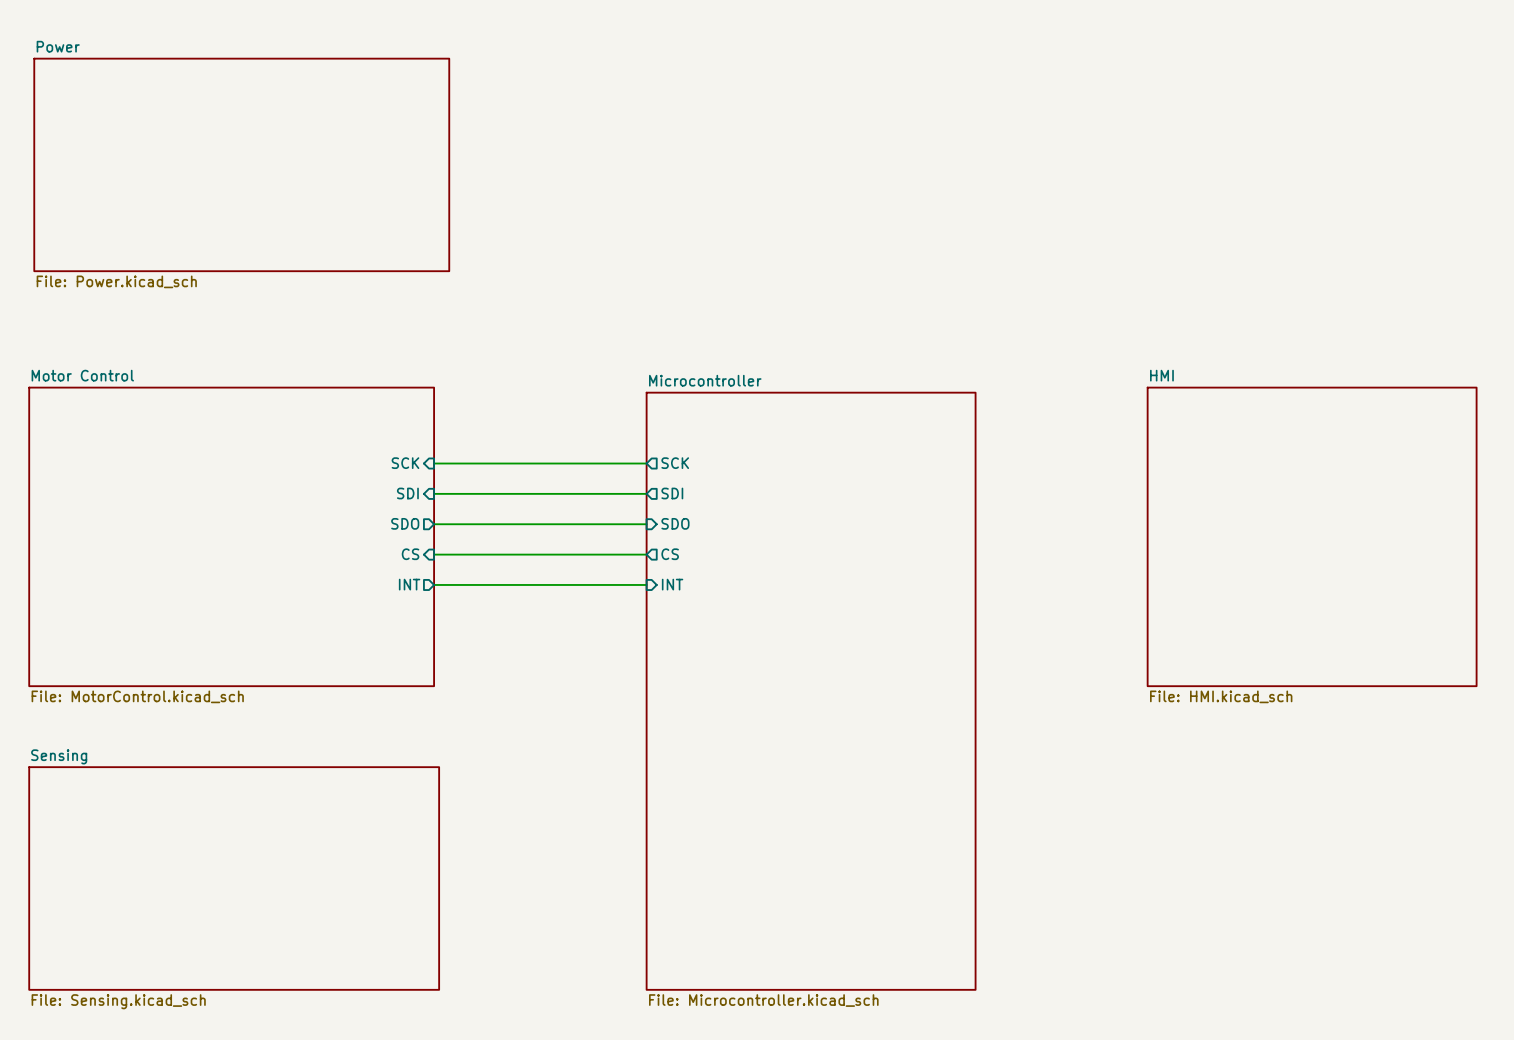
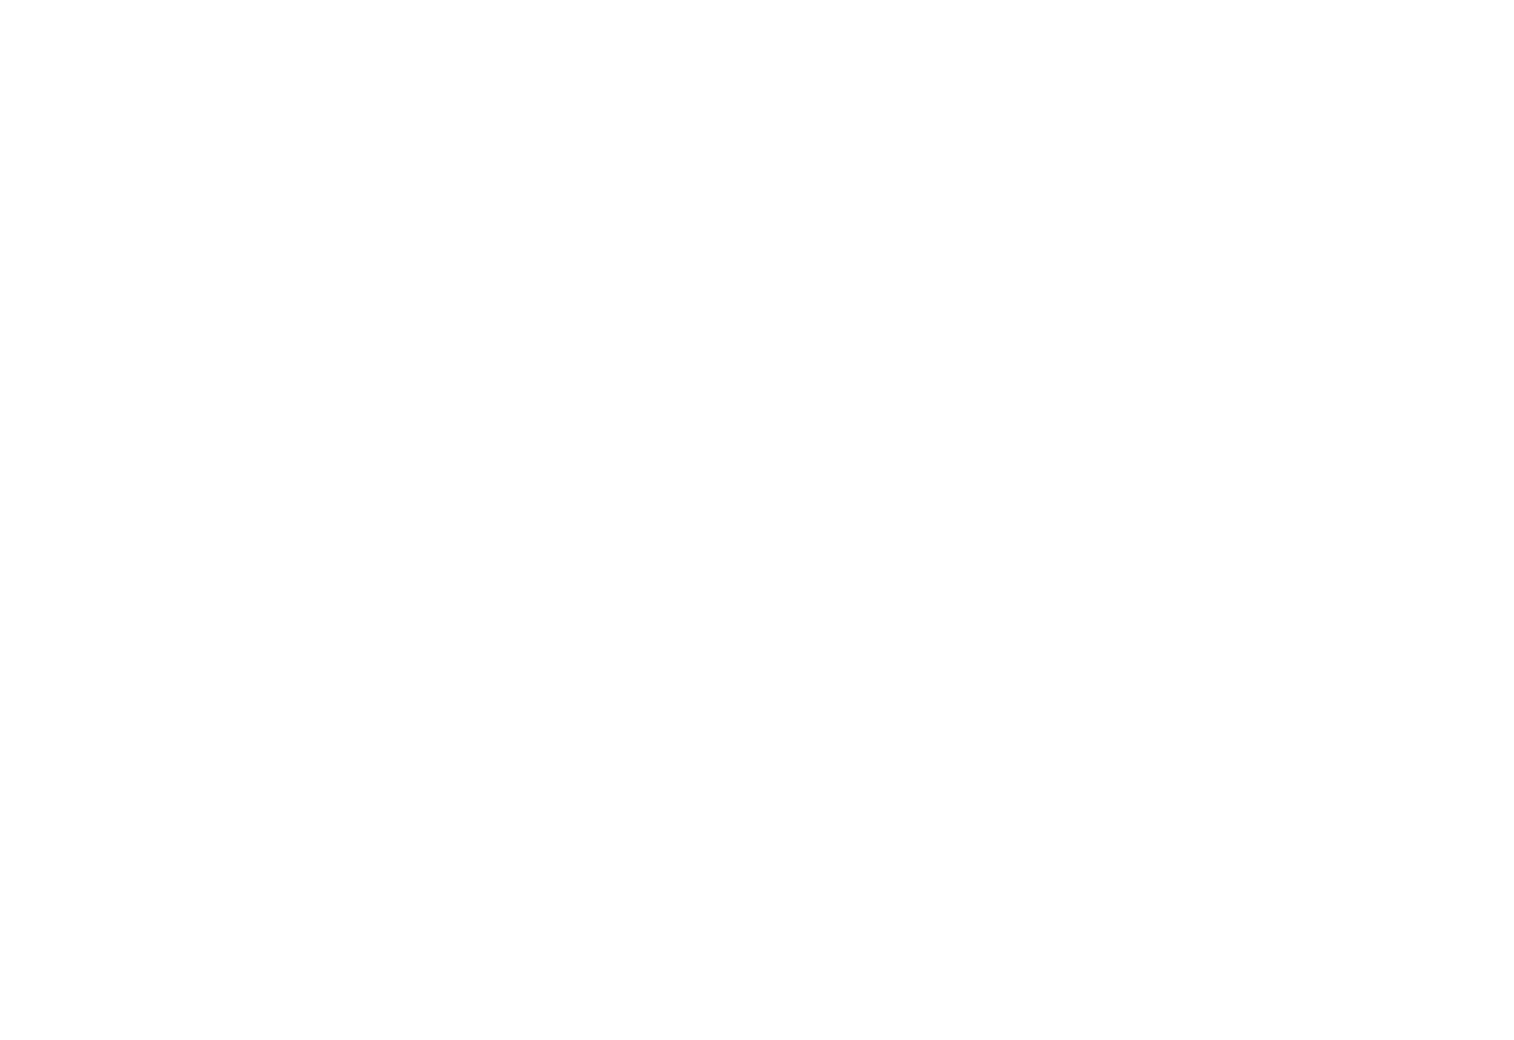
sheet Power: File: Power.kicad_sch (241, 164) -> none
sheet pin: SCK (405, 463) -> none
wire: (434, 463) (646, 463) -> none
sheet pin: SCK (675, 463) -> none
sheet pin: SDI (407, 493) -> none
wire: (434, 493) (646, 493) -> none
sheet pin: SDI (672, 493) -> none
sheet pin: SDO (405, 523) -> none
sheet pin: SDO (675, 523) -> none
wire: (434, 524) (646, 524) -> none
sheet Motor Control: File: MotorControl.kicad_sch (231, 536) -> none
sheet HMI: File: HMI.kicad_sch (1312, 536) -> none
sheet pin: CS (410, 554) -> none
wire: (434, 554) (646, 554) -> none
sheet pin: CS (670, 554) -> none
sheet pin: INT (409, 584) -> none
wire: (434, 584) (646, 584) -> none
sheet pin: INT (672, 584) -> none
sheet Microcontroller: File: Microcontroller.kicad_sch (811, 691) -> none
sheet Sensing: File: Sensing.kicad_sch (234, 878) -> none

